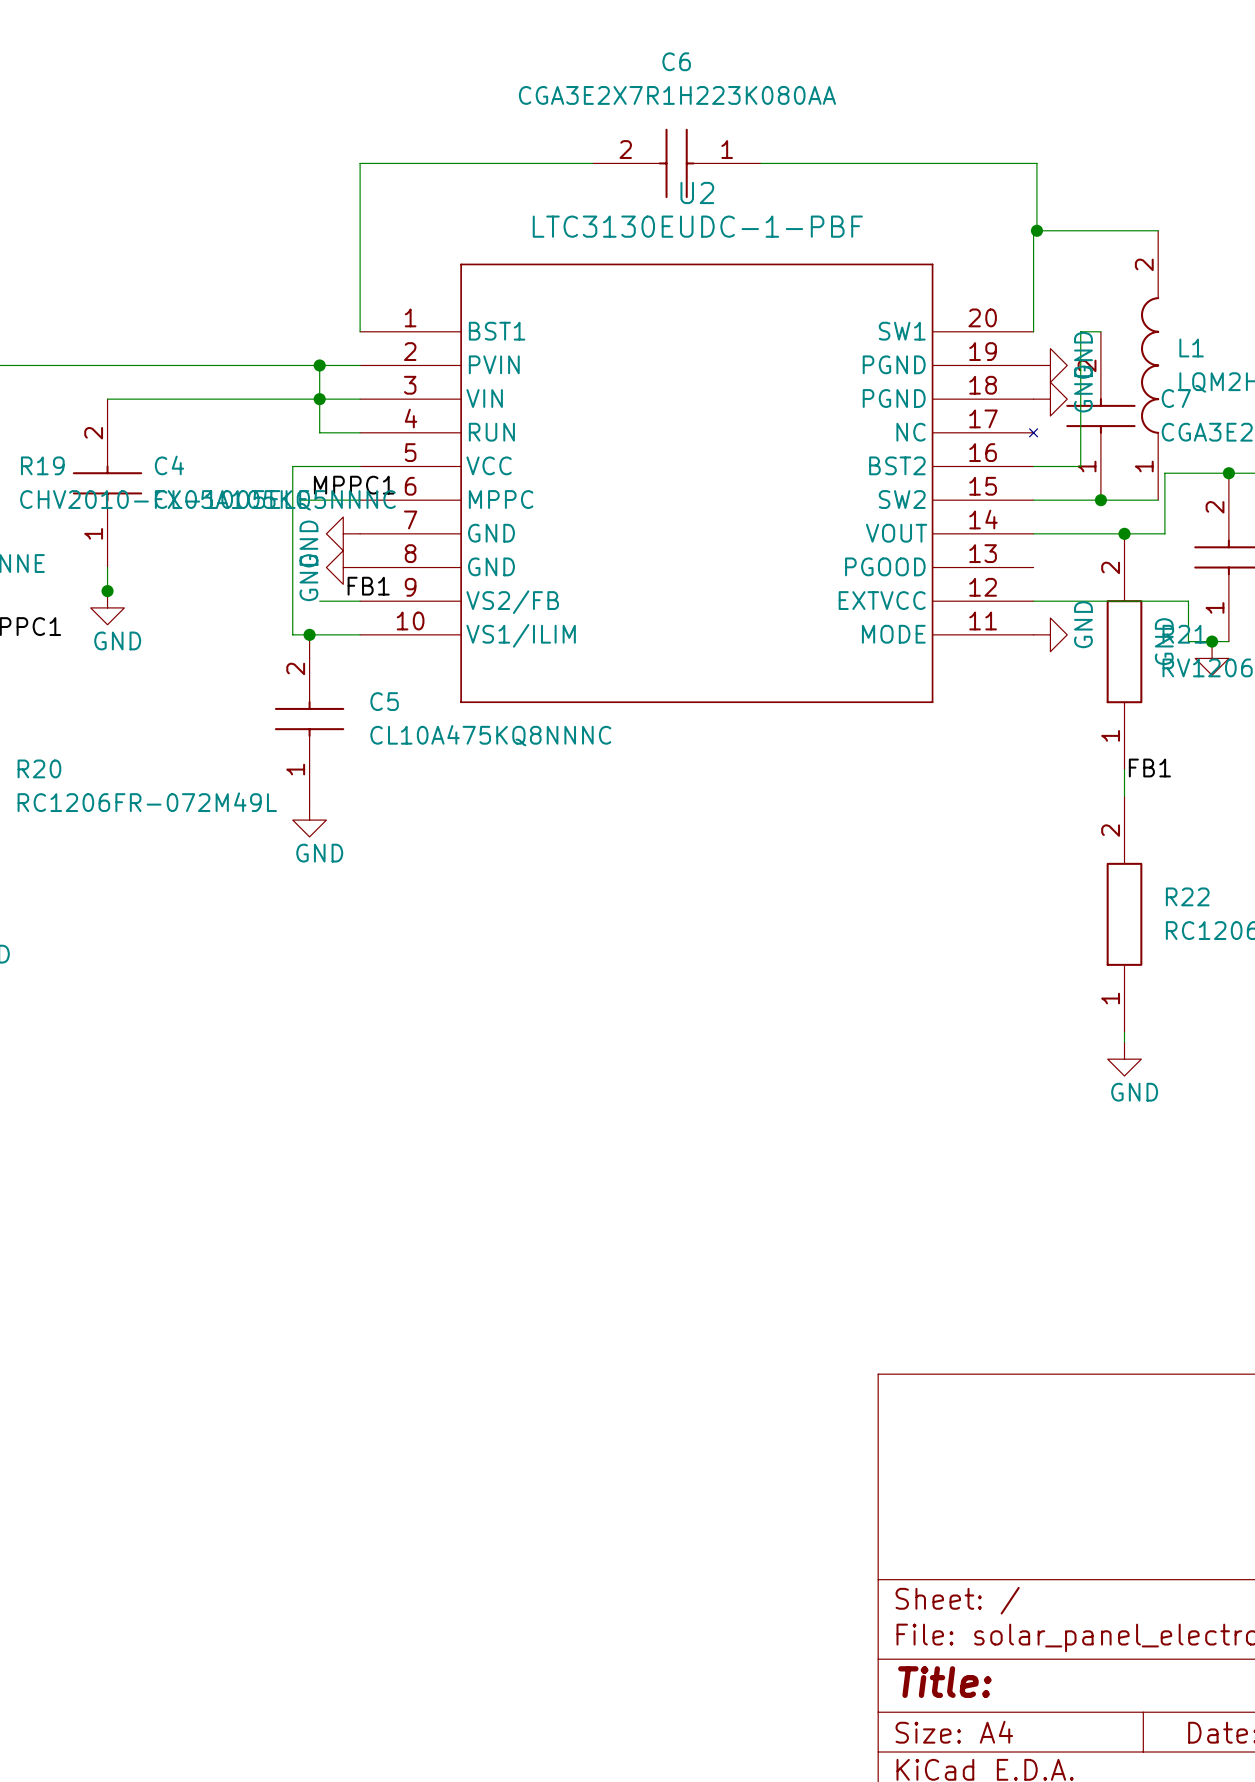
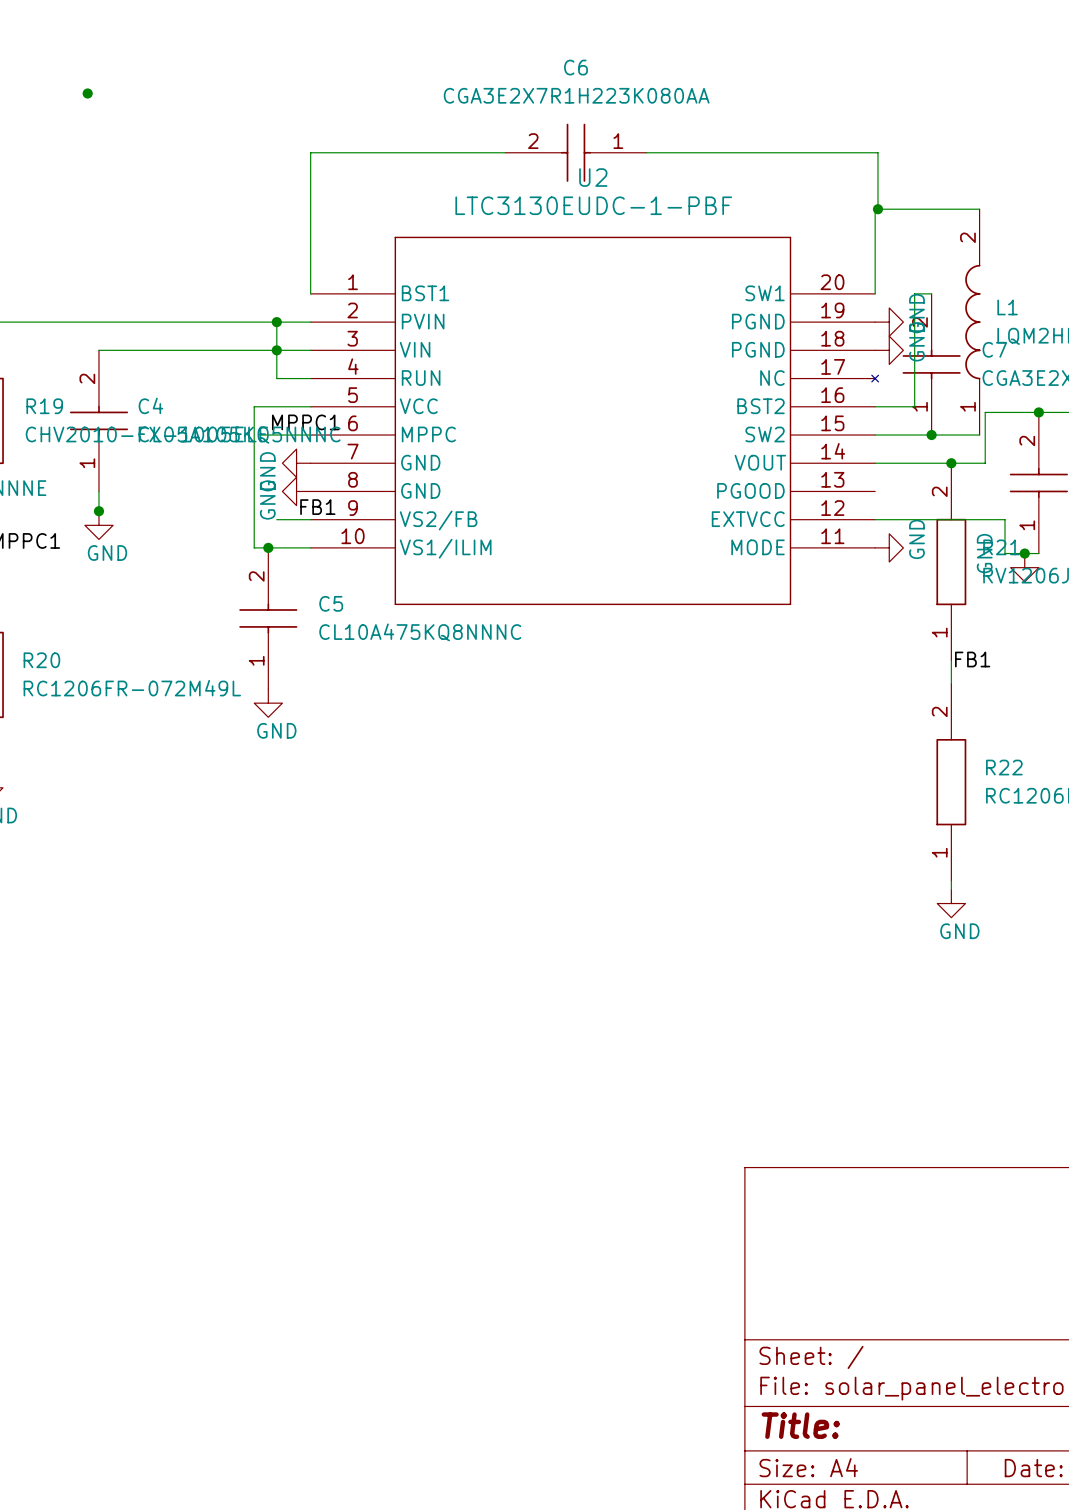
junction: none -> (87, 93)

